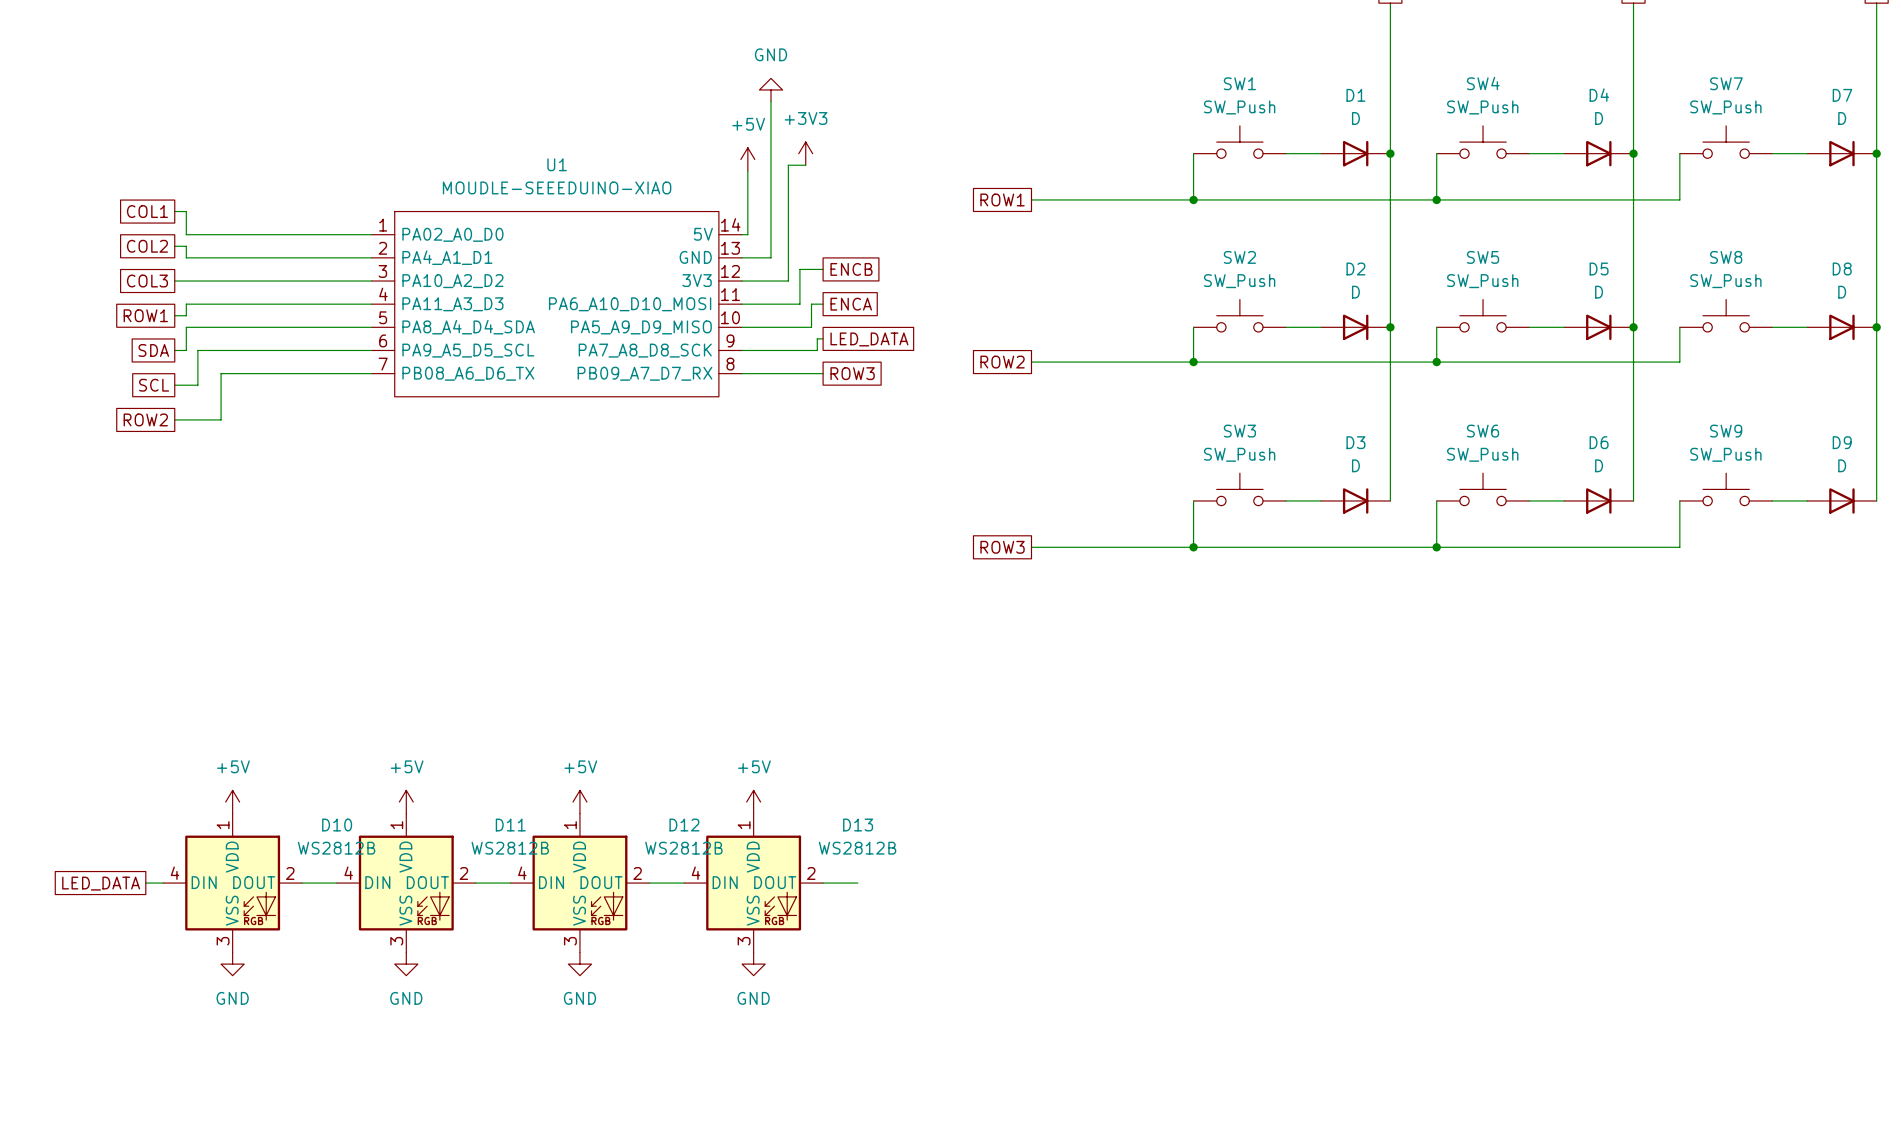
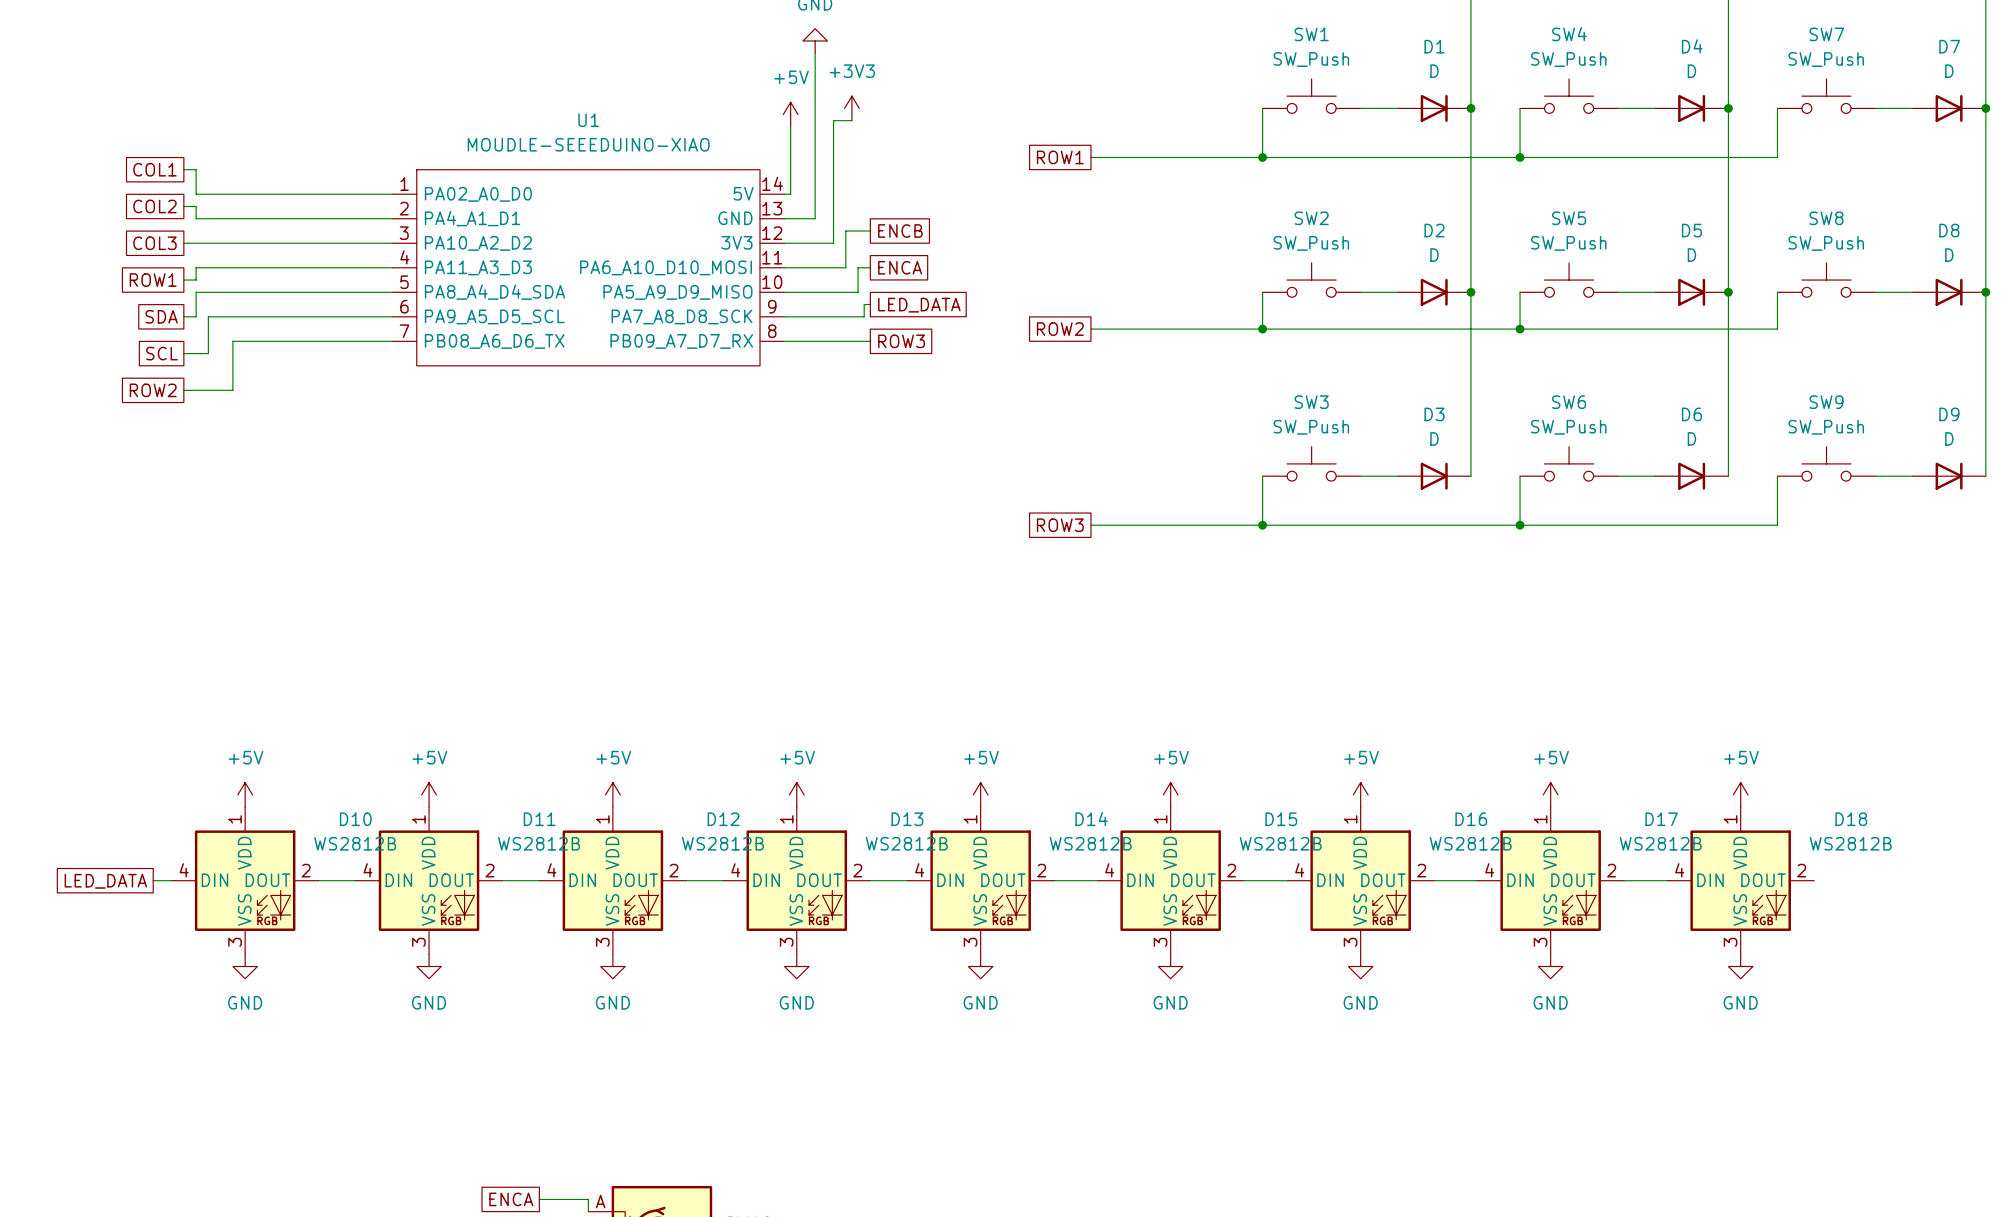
power symbol: none -> +5V (980, 794)
power symbol: none -> +5V (1170, 794)
power symbol: none -> +5V (1360, 794)
power symbol: none -> +5V (1550, 794)
power symbol: none -> +5V (1740, 794)
D14: none -> WS2812B (980, 880)
wire: none -> (1054, 880) (1097, 880)
D15: none -> WS2812B (1170, 880)
wire: none -> (1244, 880) (1287, 880)
D16: none -> WS2812B (1360, 880)
wire: none -> (1434, 880) (1477, 880)
D17: none -> WS2812B (1550, 880)
wire: none -> (1624, 880) (1667, 880)
D18: none -> WS2812B (1740, 880)
power symbol: none -> GND (980, 966)
power symbol: none -> GND (1170, 966)
power symbol: none -> GND (1360, 966)
power symbol: none -> GND (1550, 966)
power symbol: none -> GND (1740, 966)

